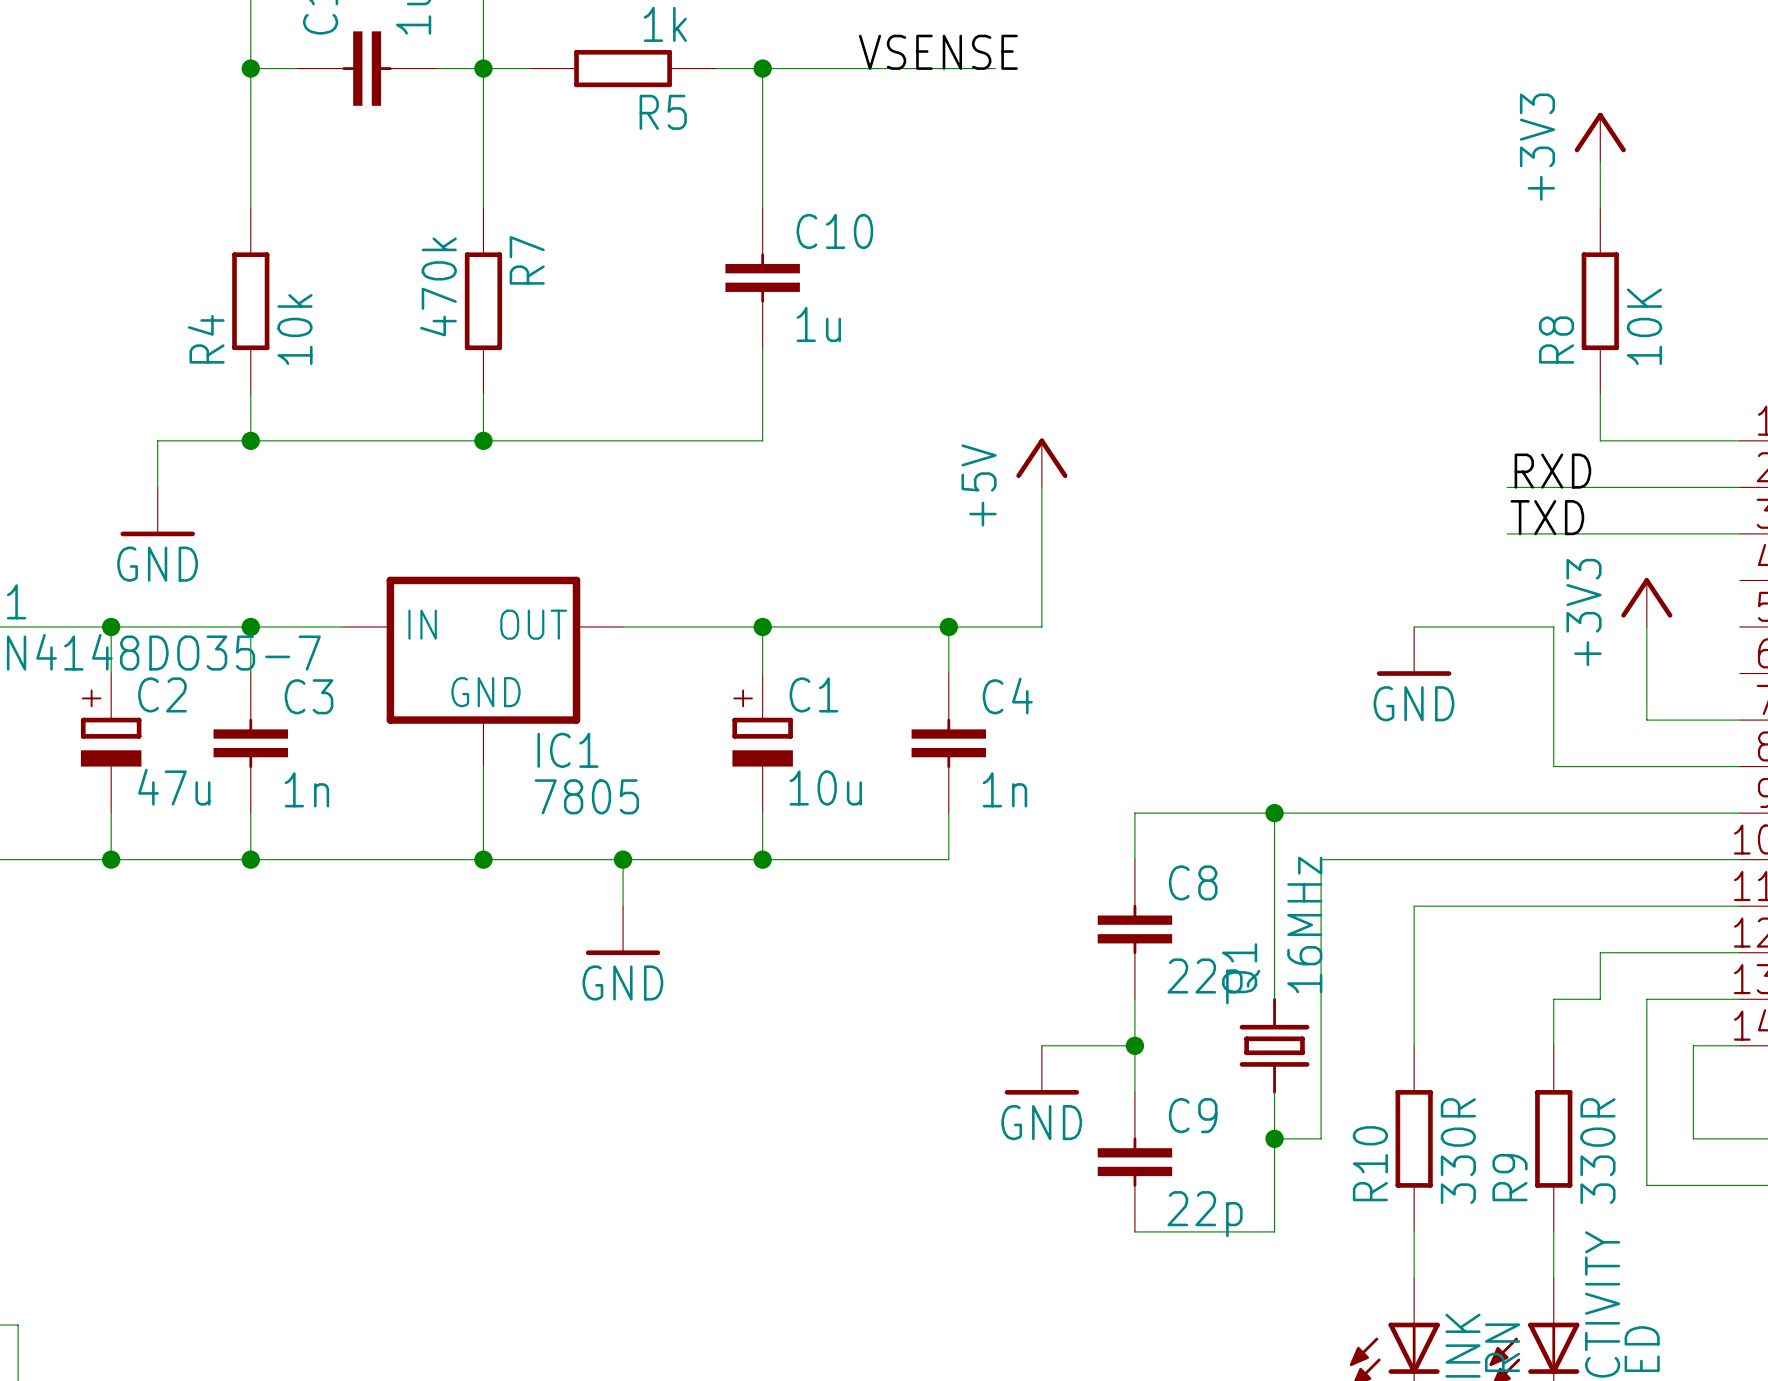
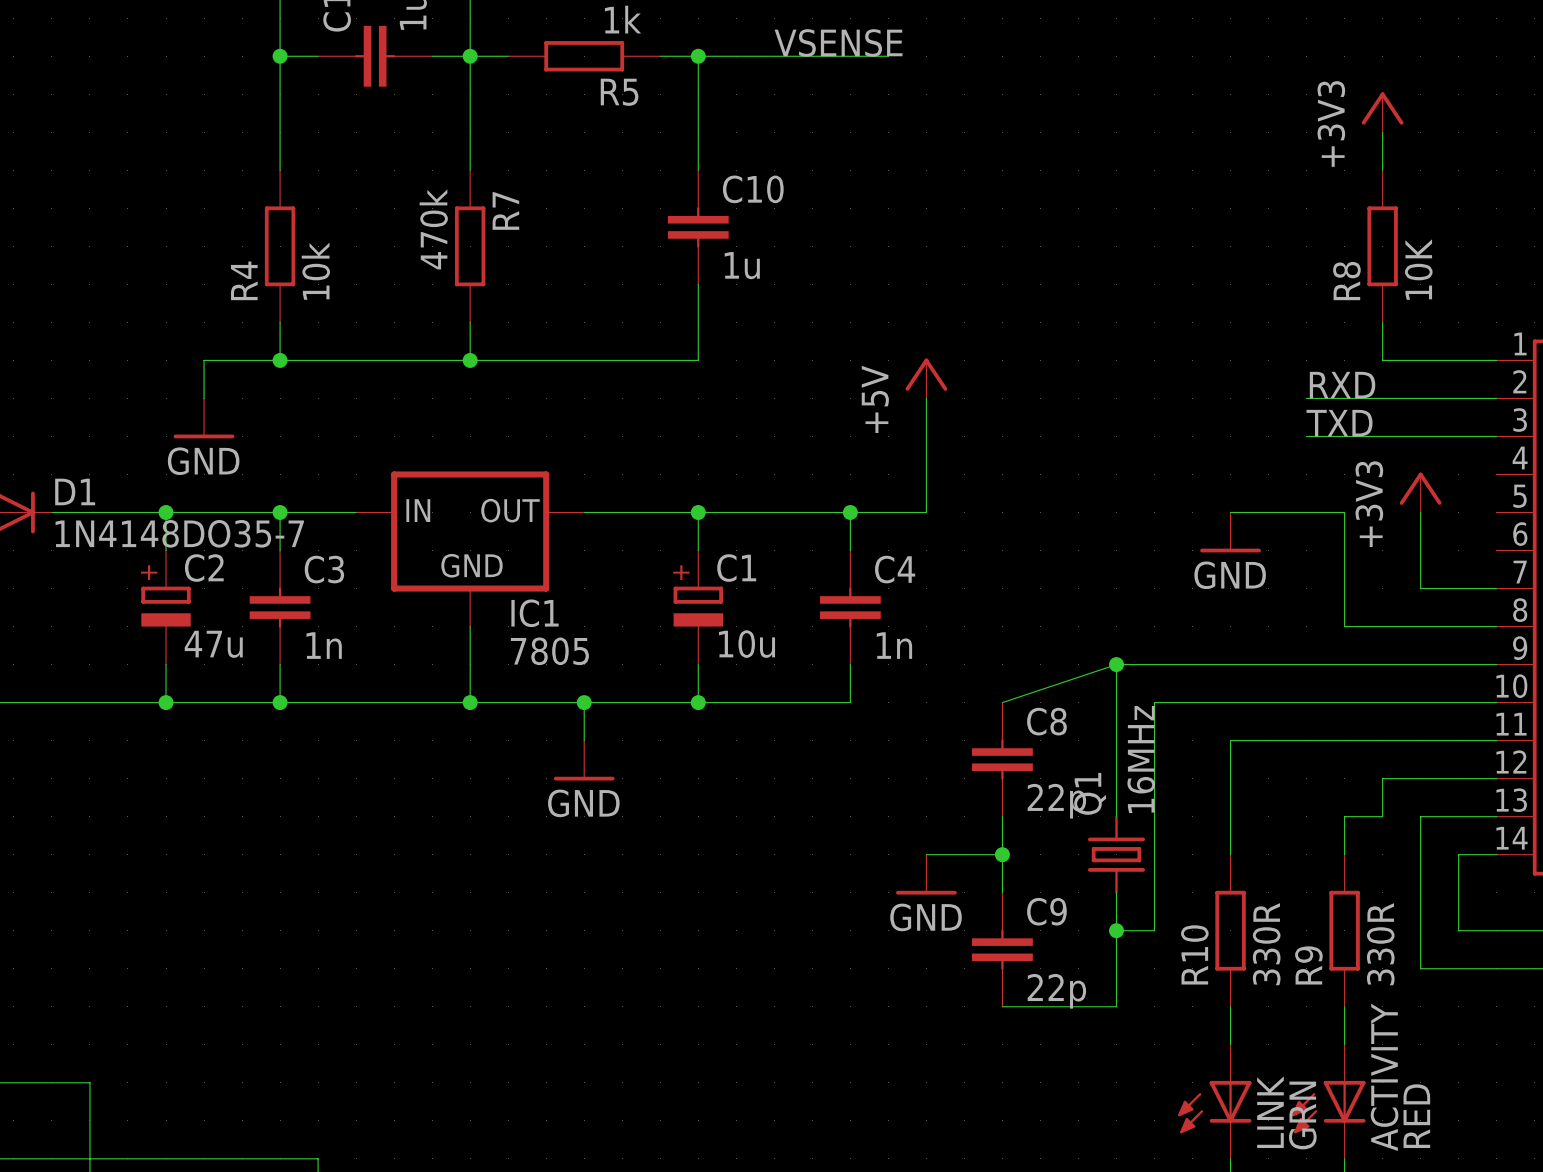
wire: (1274, 813) (1134, 813) (1134, 859) -> (1116, 664) (1002, 702)

